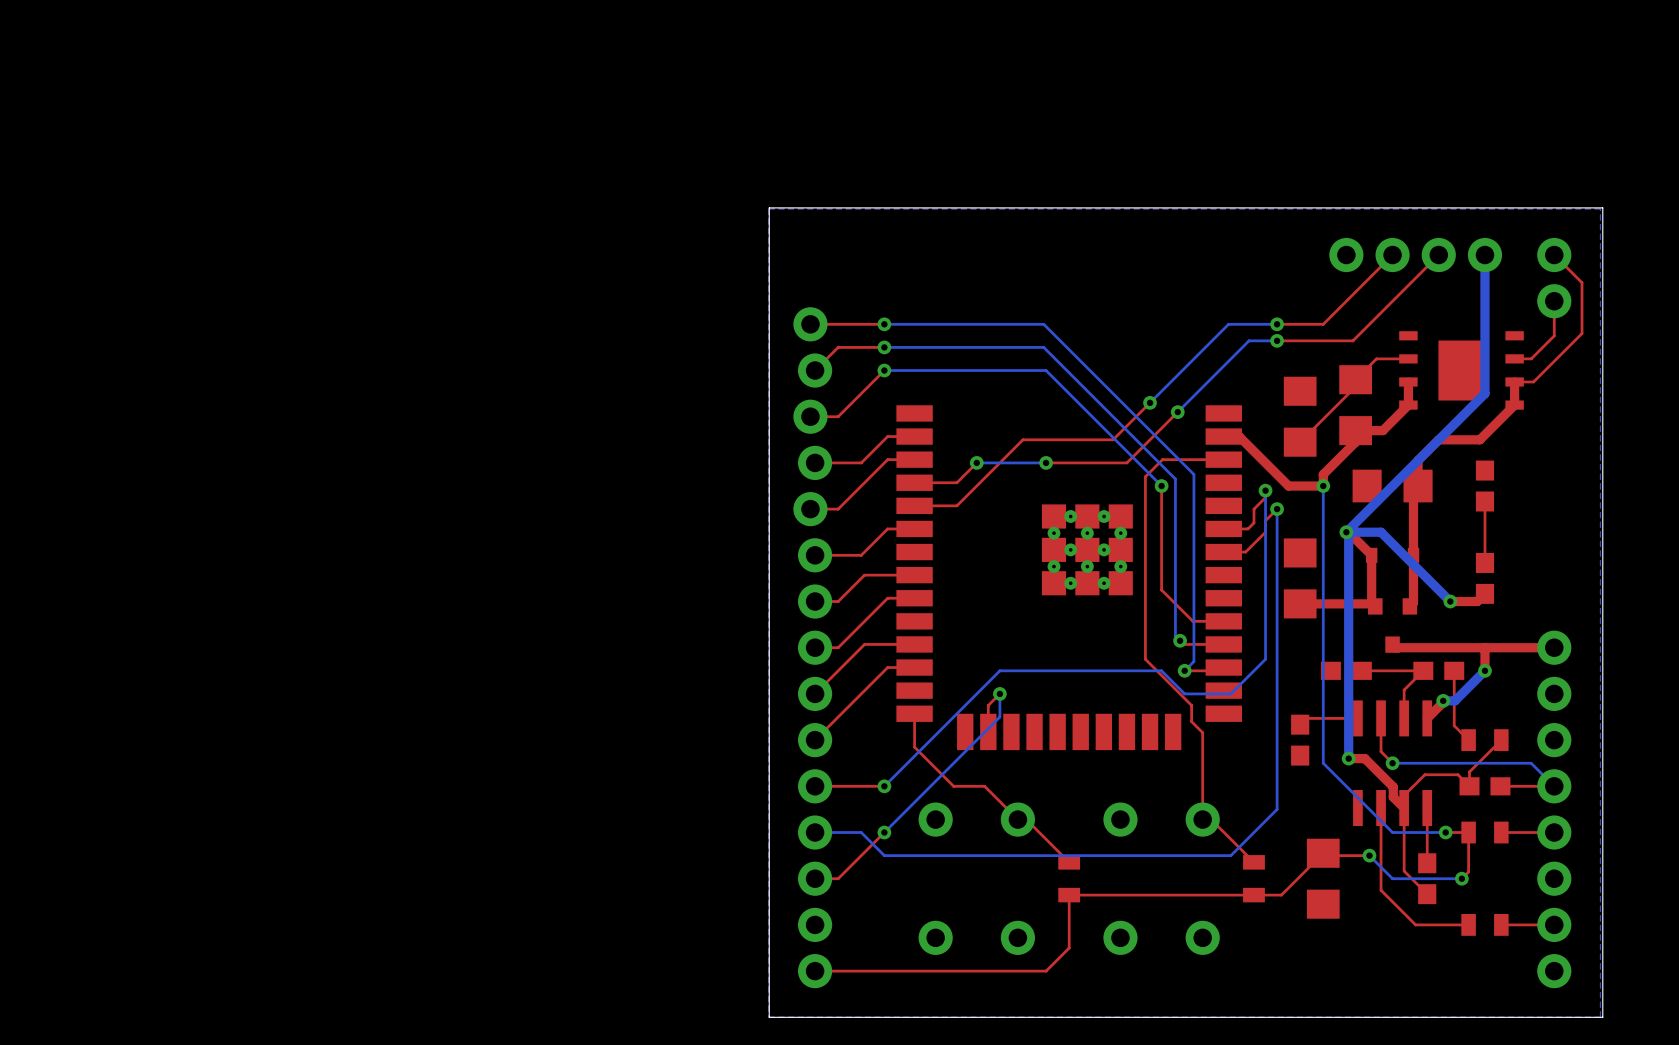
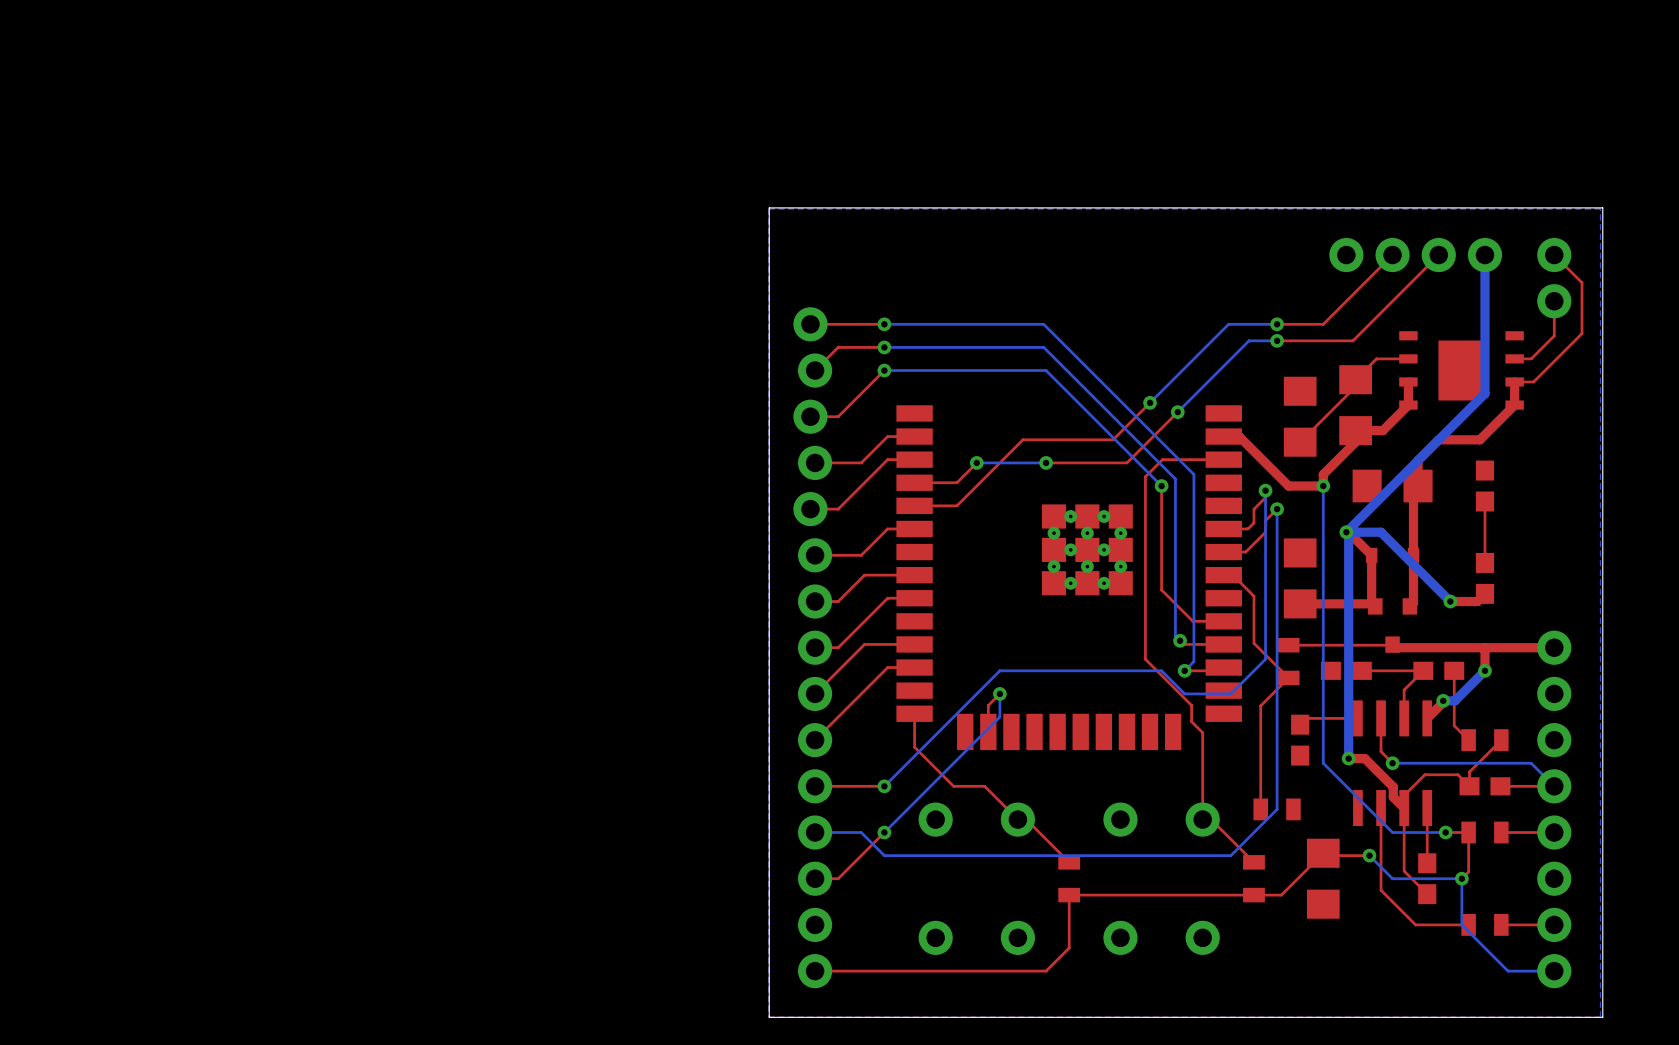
top track: none -> (1223, 575) (1232, 575) (1253, 596) (1253, 643) (1288, 677) (1260, 705) (1260, 809)
top track: none -> (1392, 644) (1288, 645)
part: none -> (1288, 661)
part: none -> (1277, 809)
bottom track: none -> (1461, 878) (1461, 924) (1508, 971) (1554, 971)

